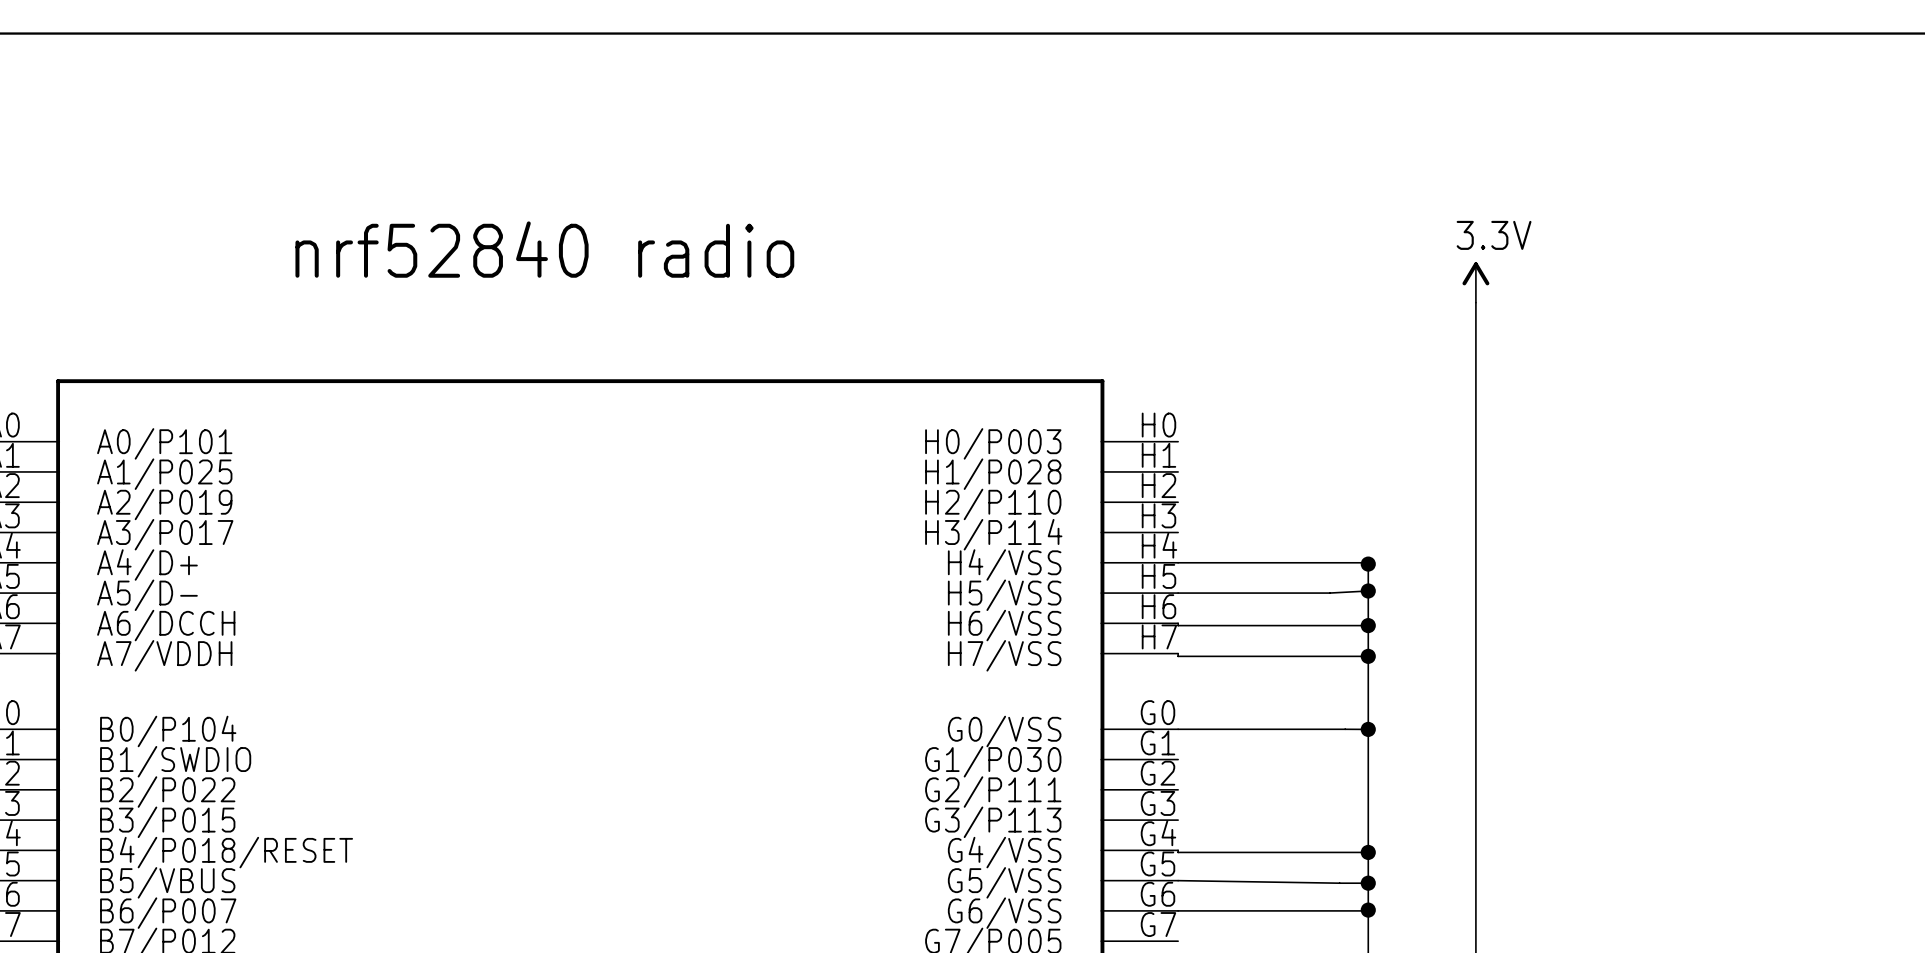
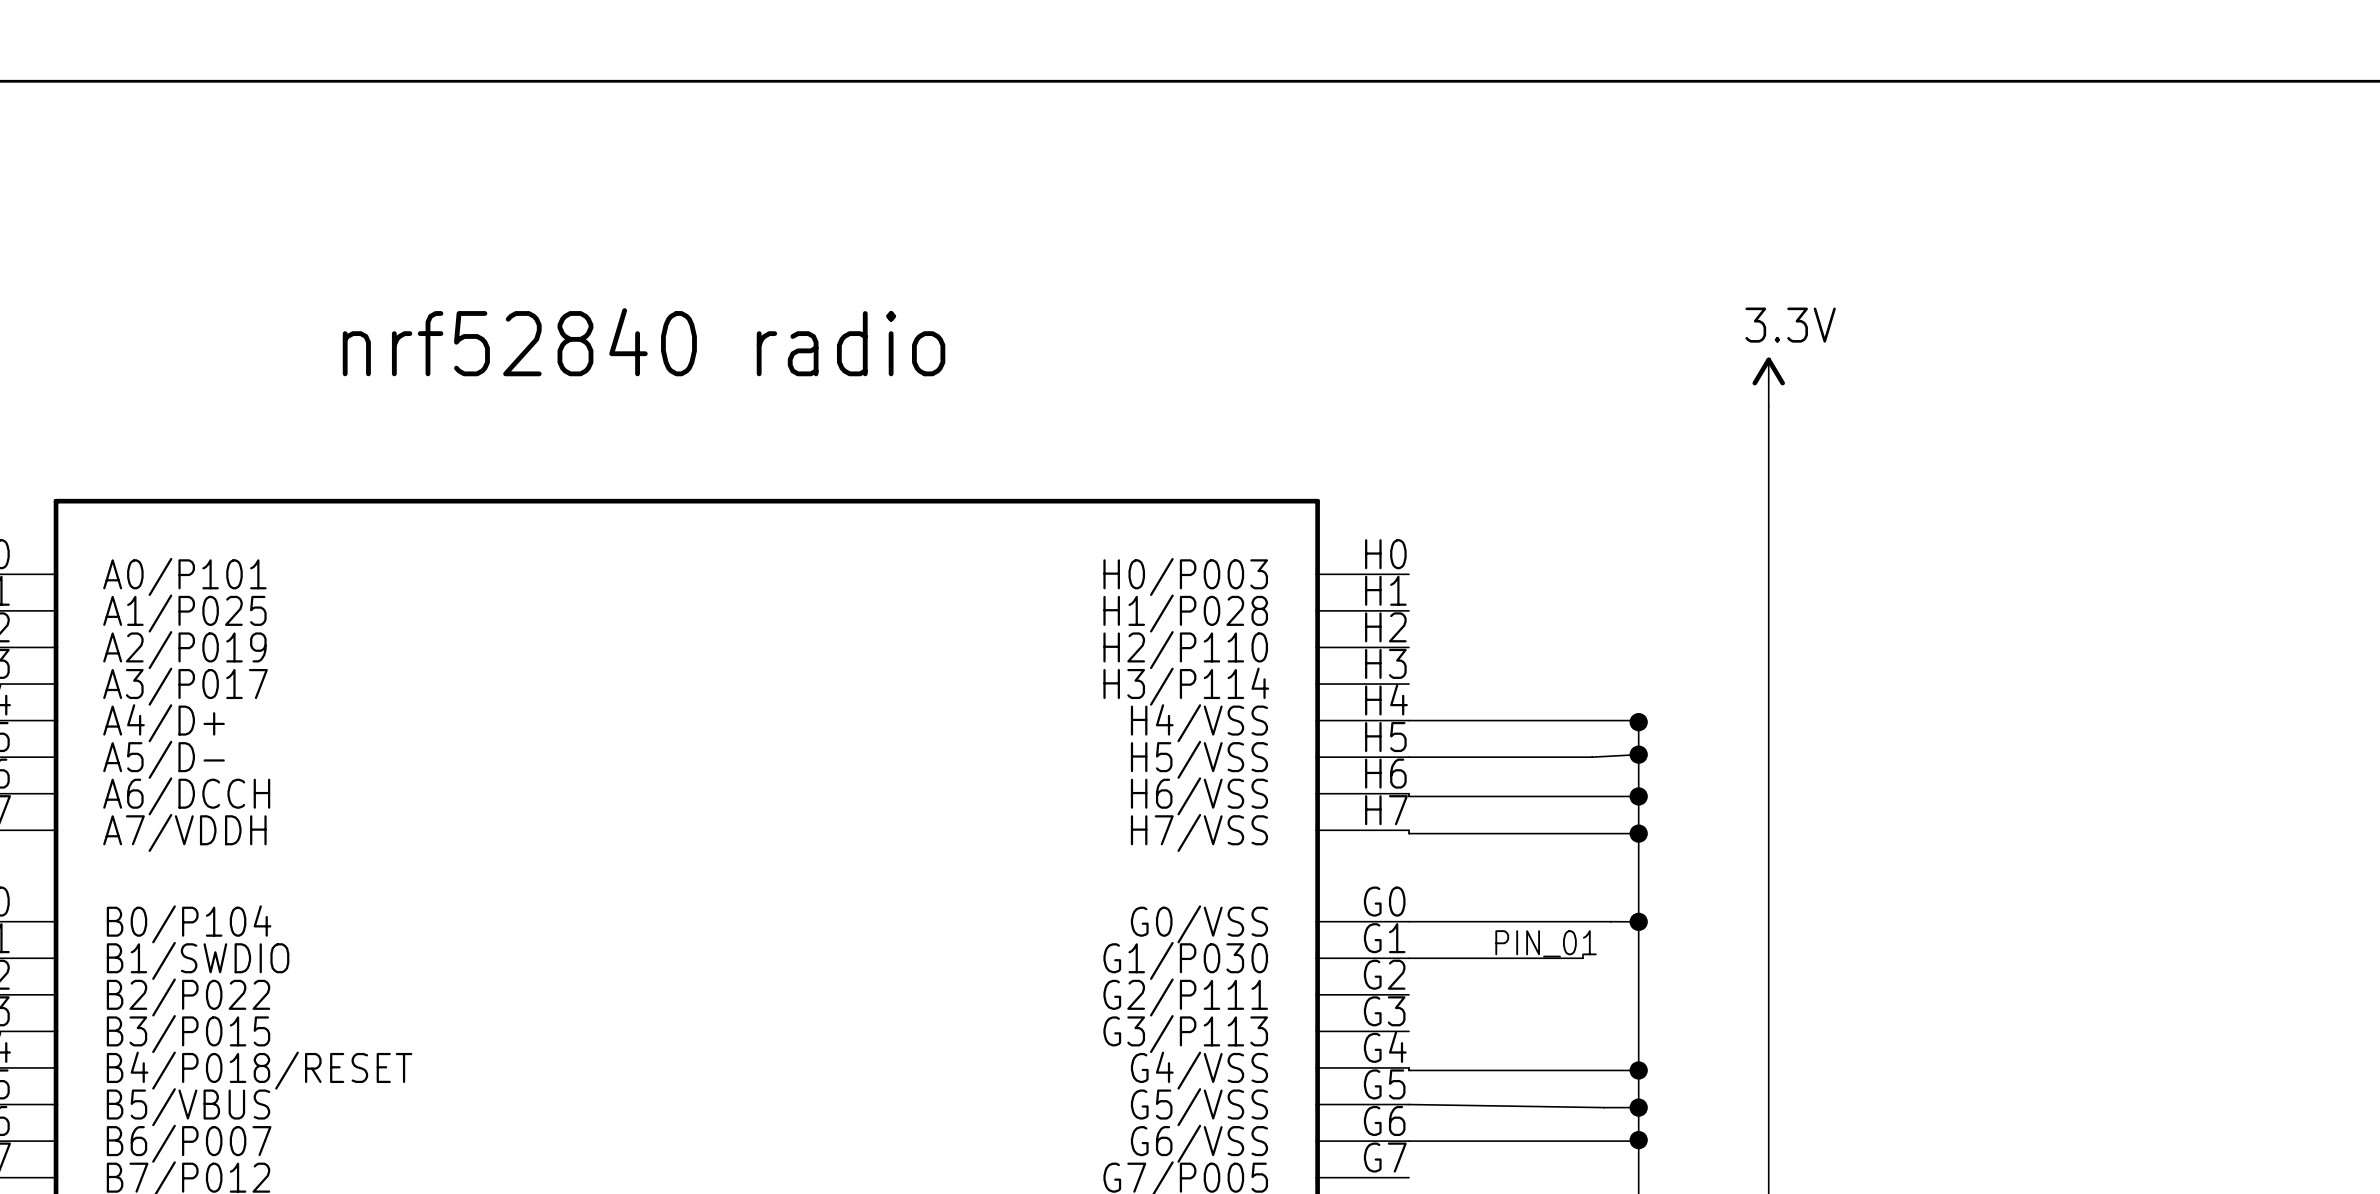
label: none -> PIN_01 (1546, 943)
wire: none -> (1582, 954) (1582, 958) (1409, 958)

